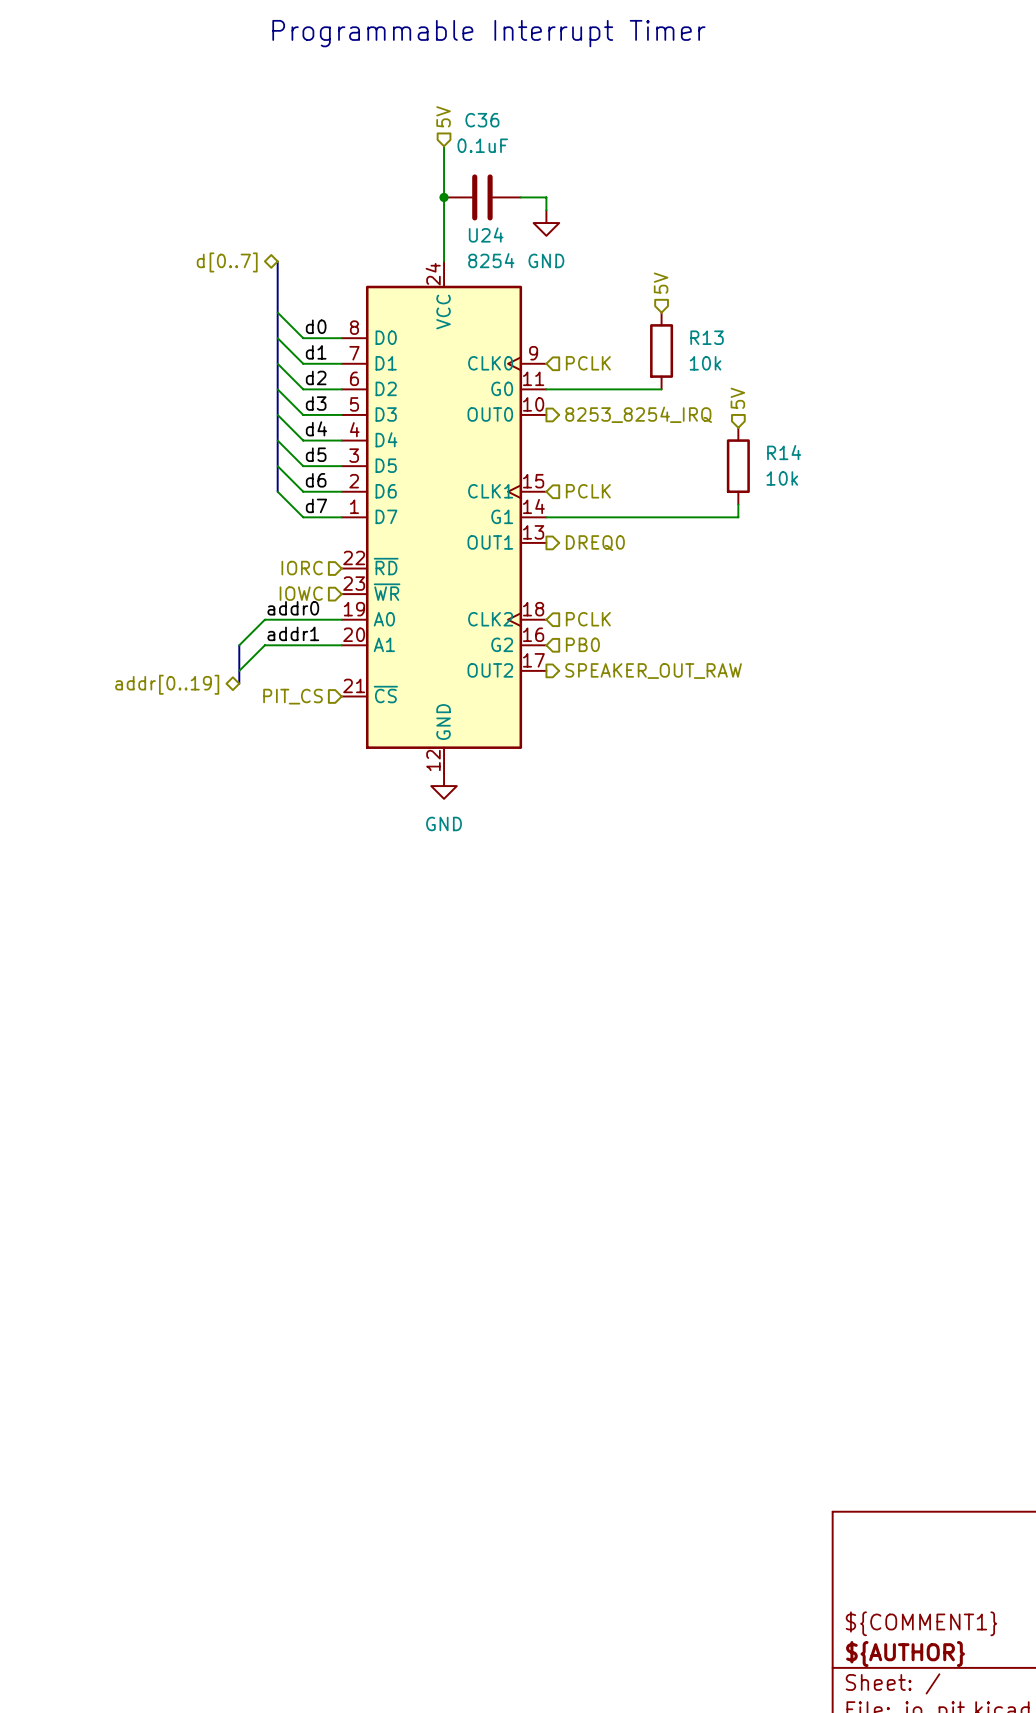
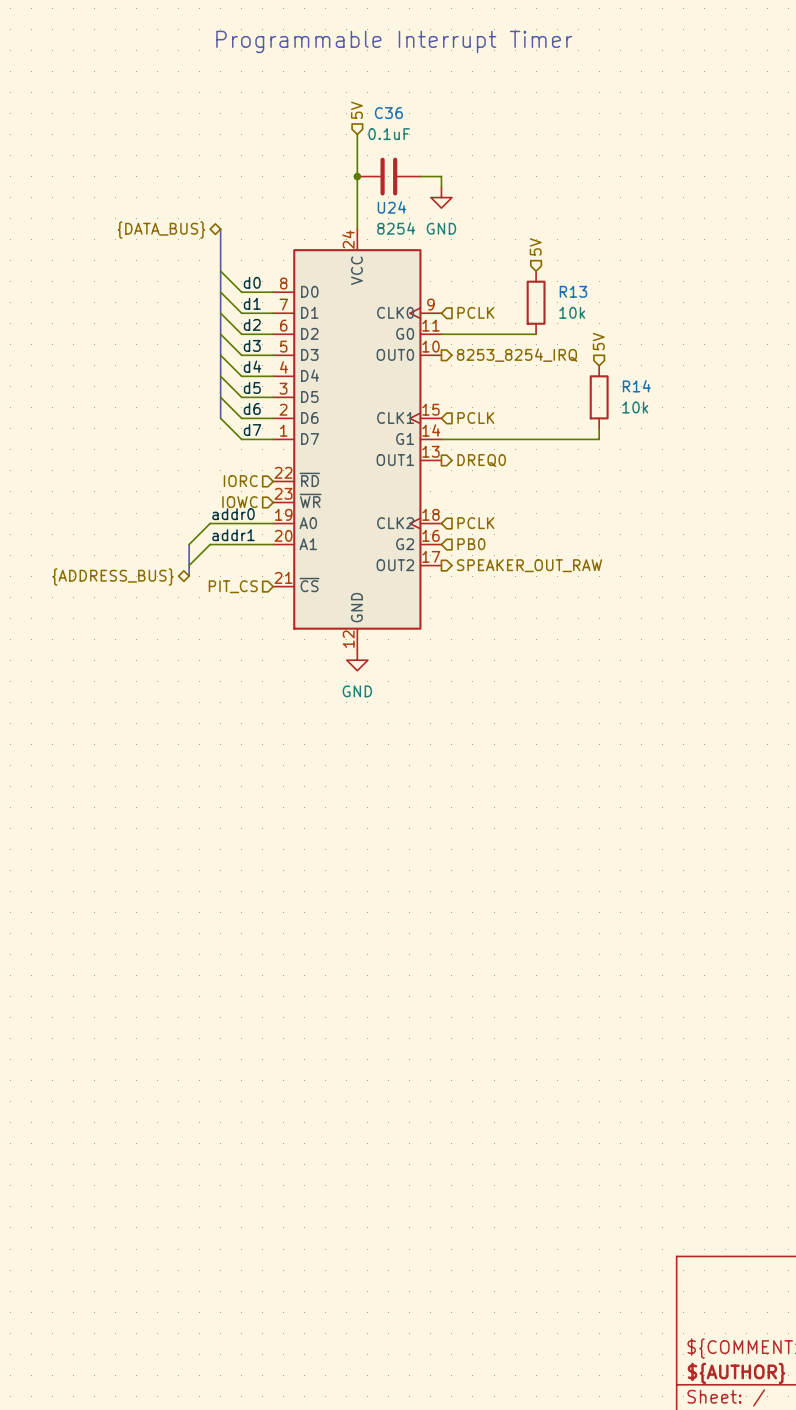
hierarchical label: d[0..7] (227, 262) -> {DATA_BUS} (161, 229)
hierarchical label: addr[0..19] (167, 684) -> {ADDRESS_BUS} (113, 576)

